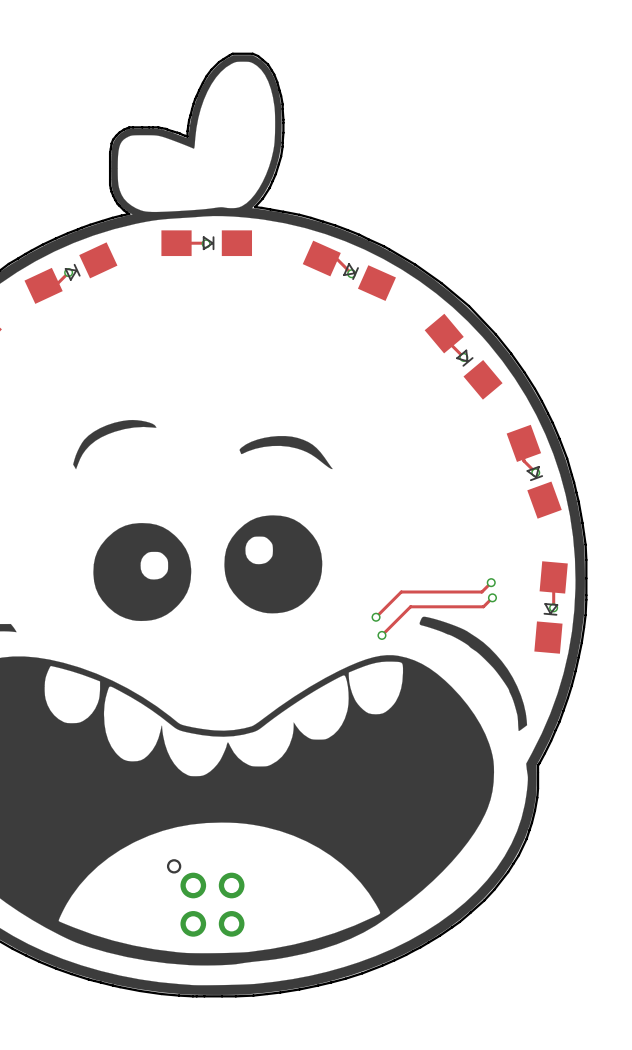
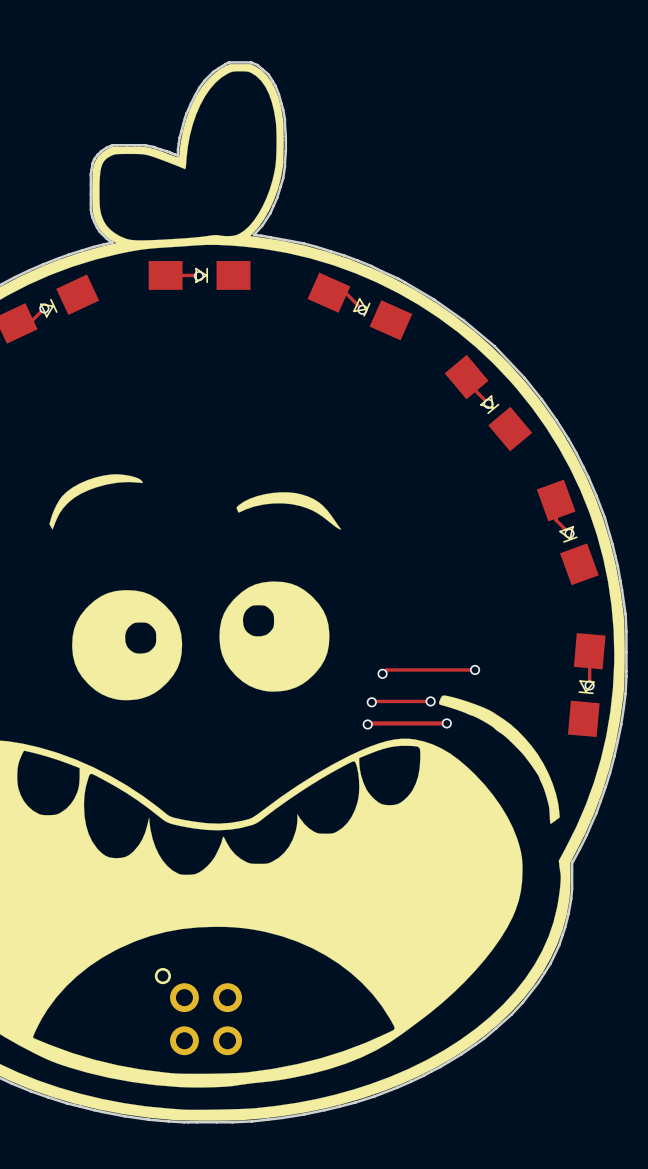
track: (491, 582) (481, 592) (401, 592) (376, 617) -> none
via: (491, 582) -> none
track: none -> (475, 669) (386, 669) (382, 673)
via: none -> (475, 669)
via: none -> (382, 673)
track: (492, 597) (483, 606) (410, 606) (381, 635) -> none
via: (492, 597) -> none
via: (376, 617) -> none
via: none -> (371, 702)
track: none -> (430, 701) (371, 702)
via: none -> (430, 701)
via: (381, 635) -> none
track: none -> (446, 723) (367, 724)
via: none -> (446, 723)
via: none -> (367, 724)

